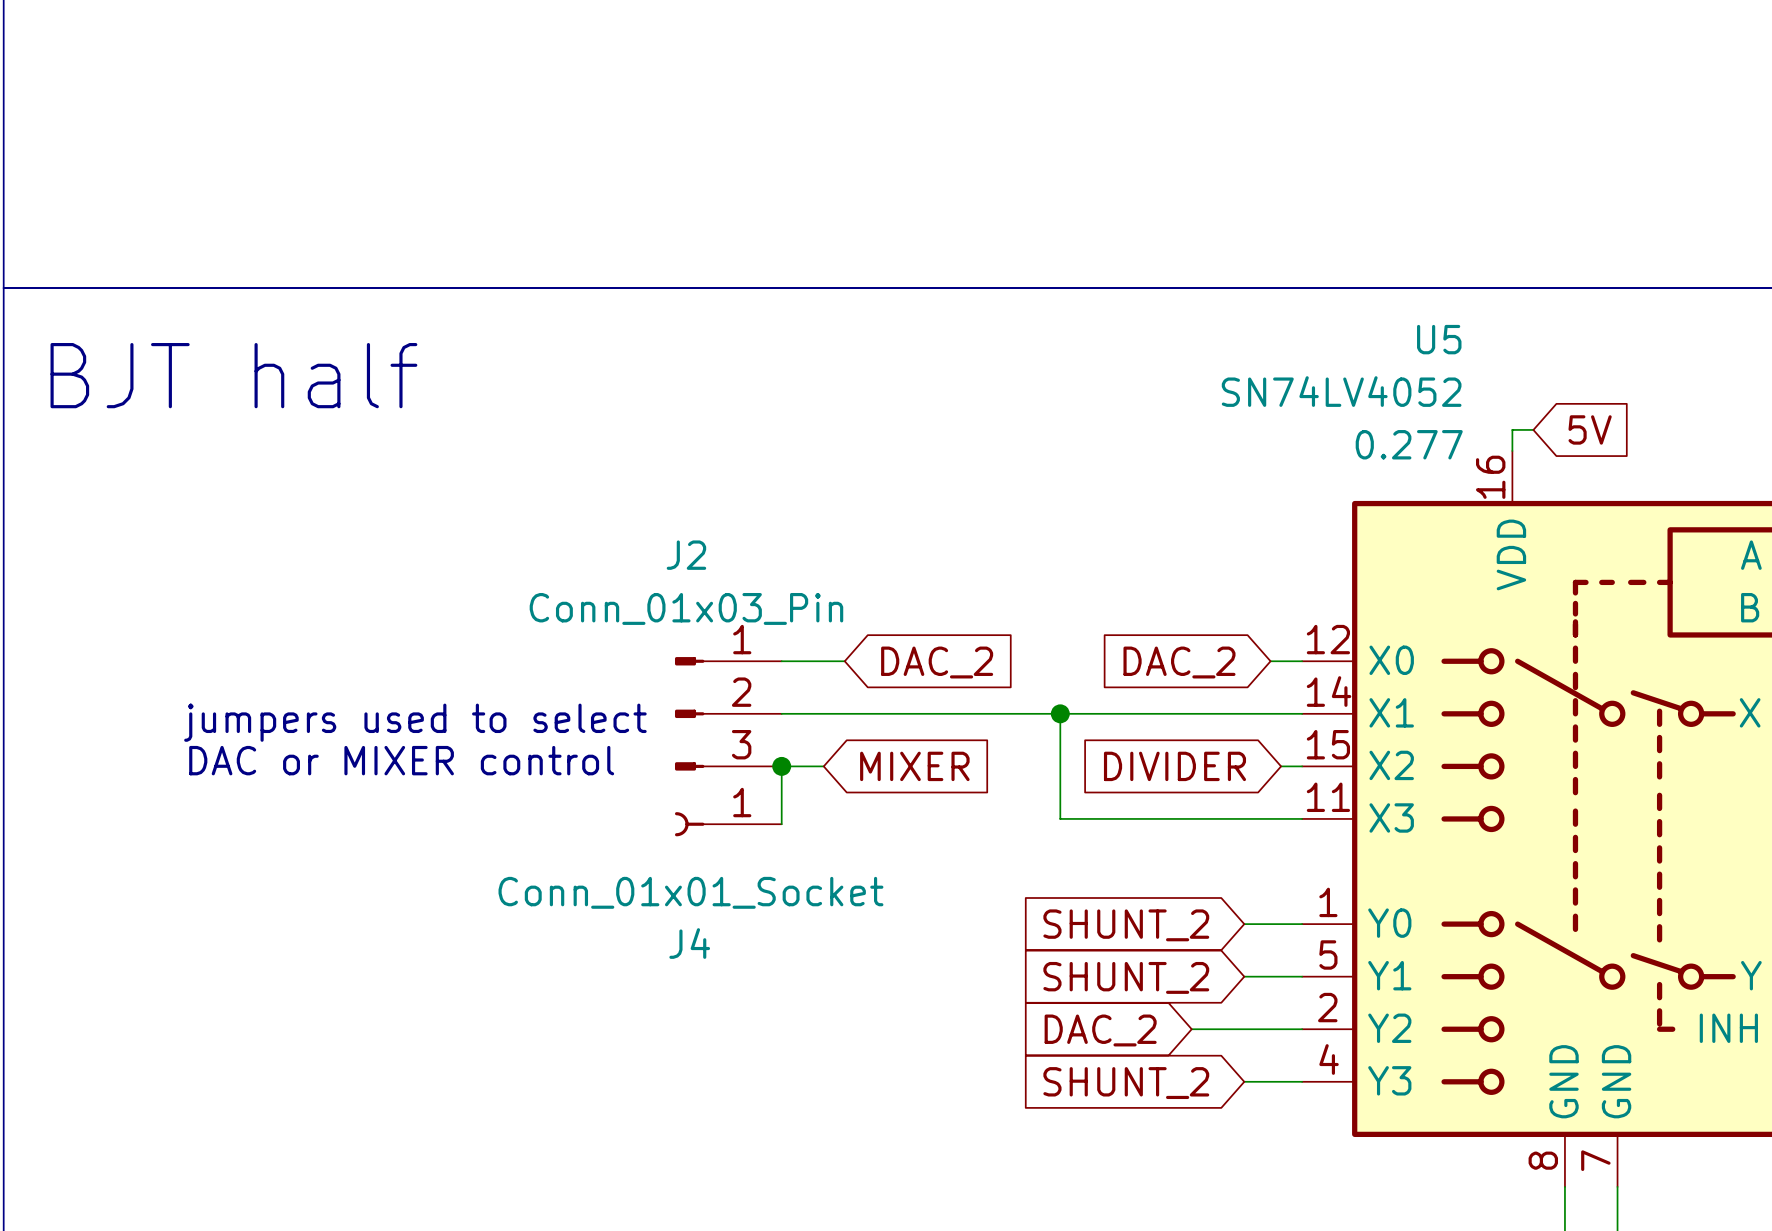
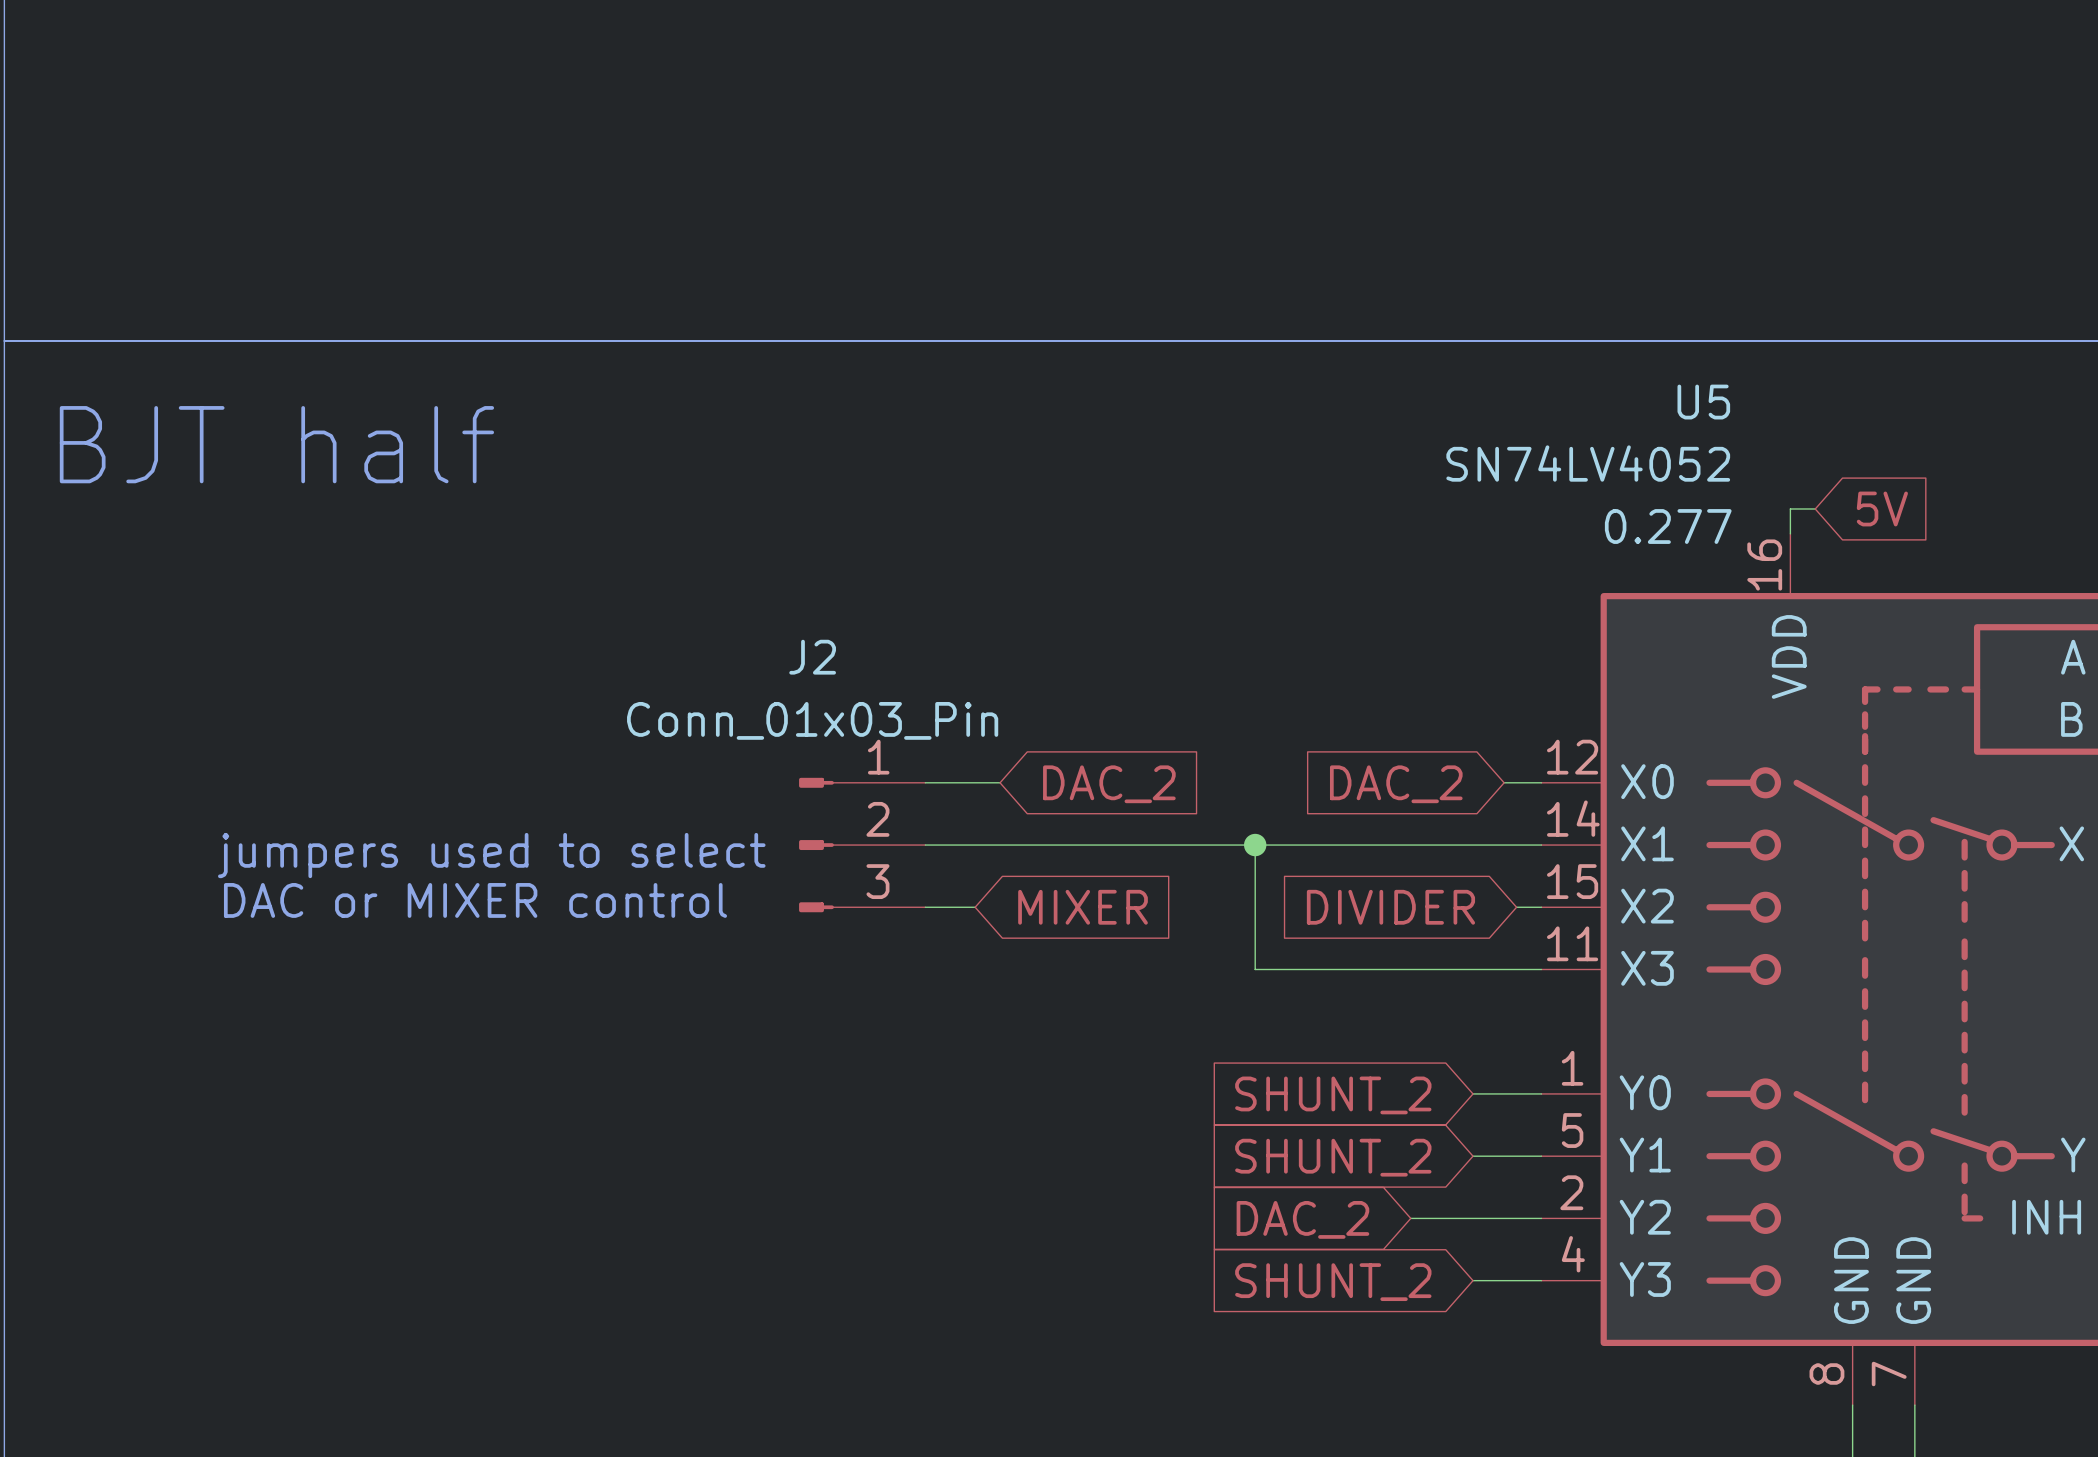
wire: (781, 766) (781, 824) -> none
junction: (781, 766) -> none
J4: Conn_01x01_Socket (728, 824) -> none

